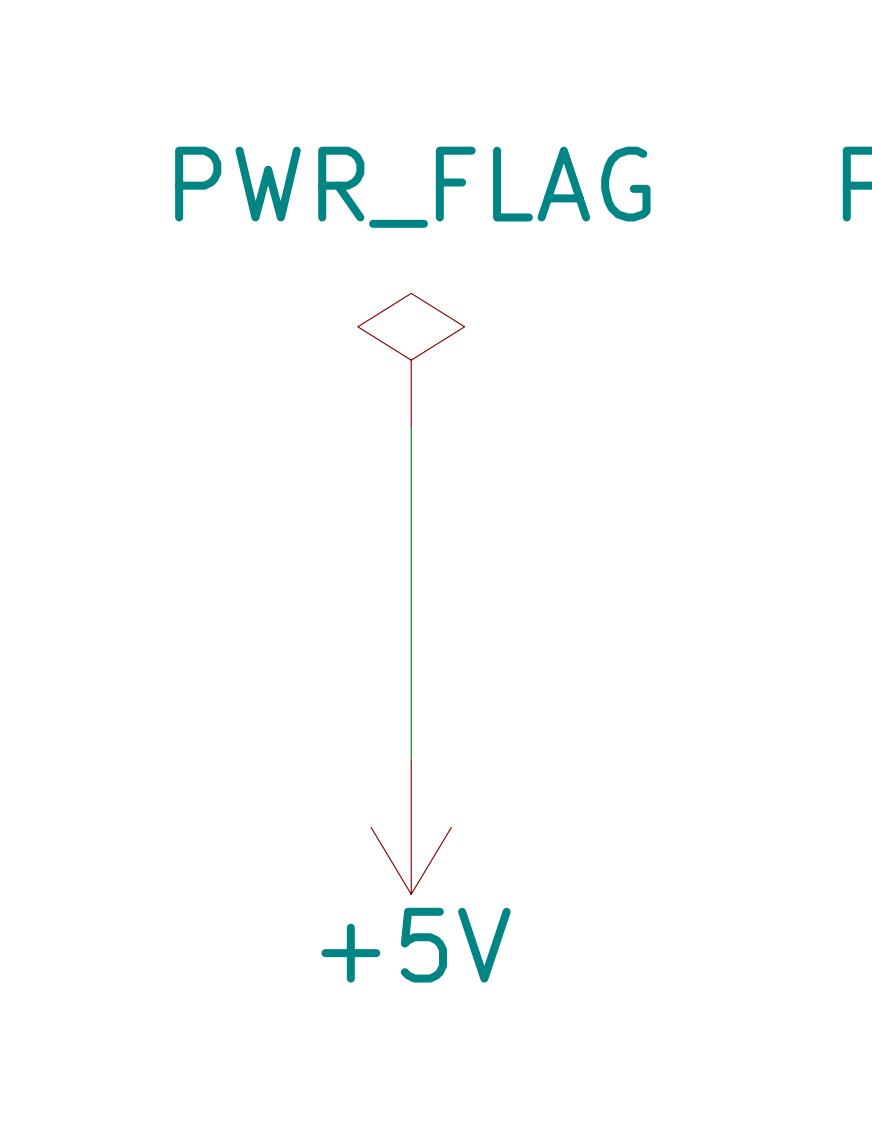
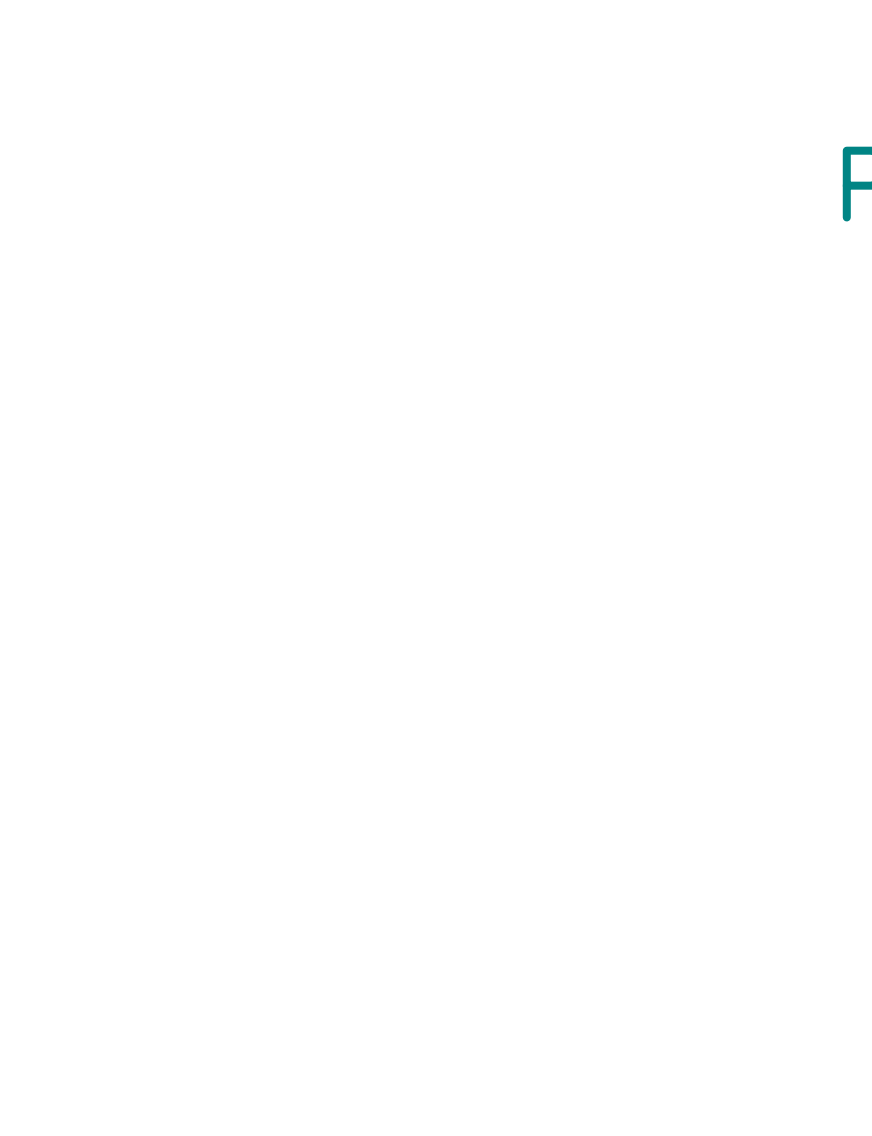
power symbol: PWR_FLAG (411, 360) -> none
wire: (411, 426) (411, 760) -> none
power symbol: +5V (411, 827) -> none

